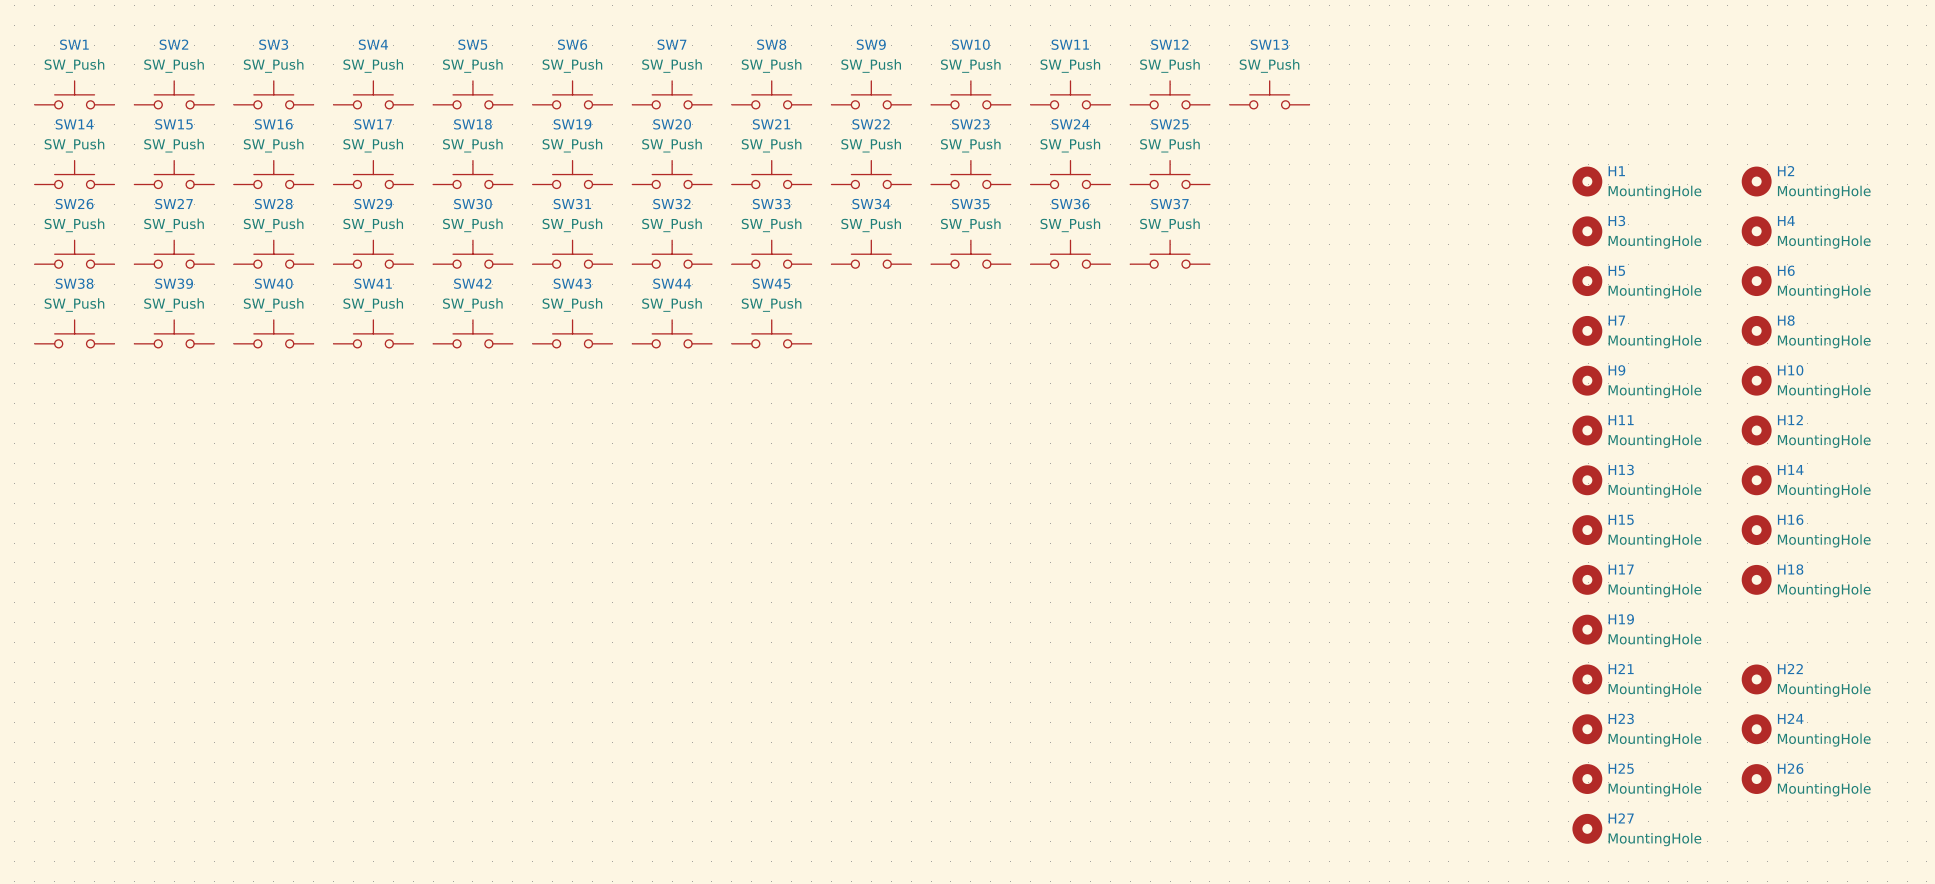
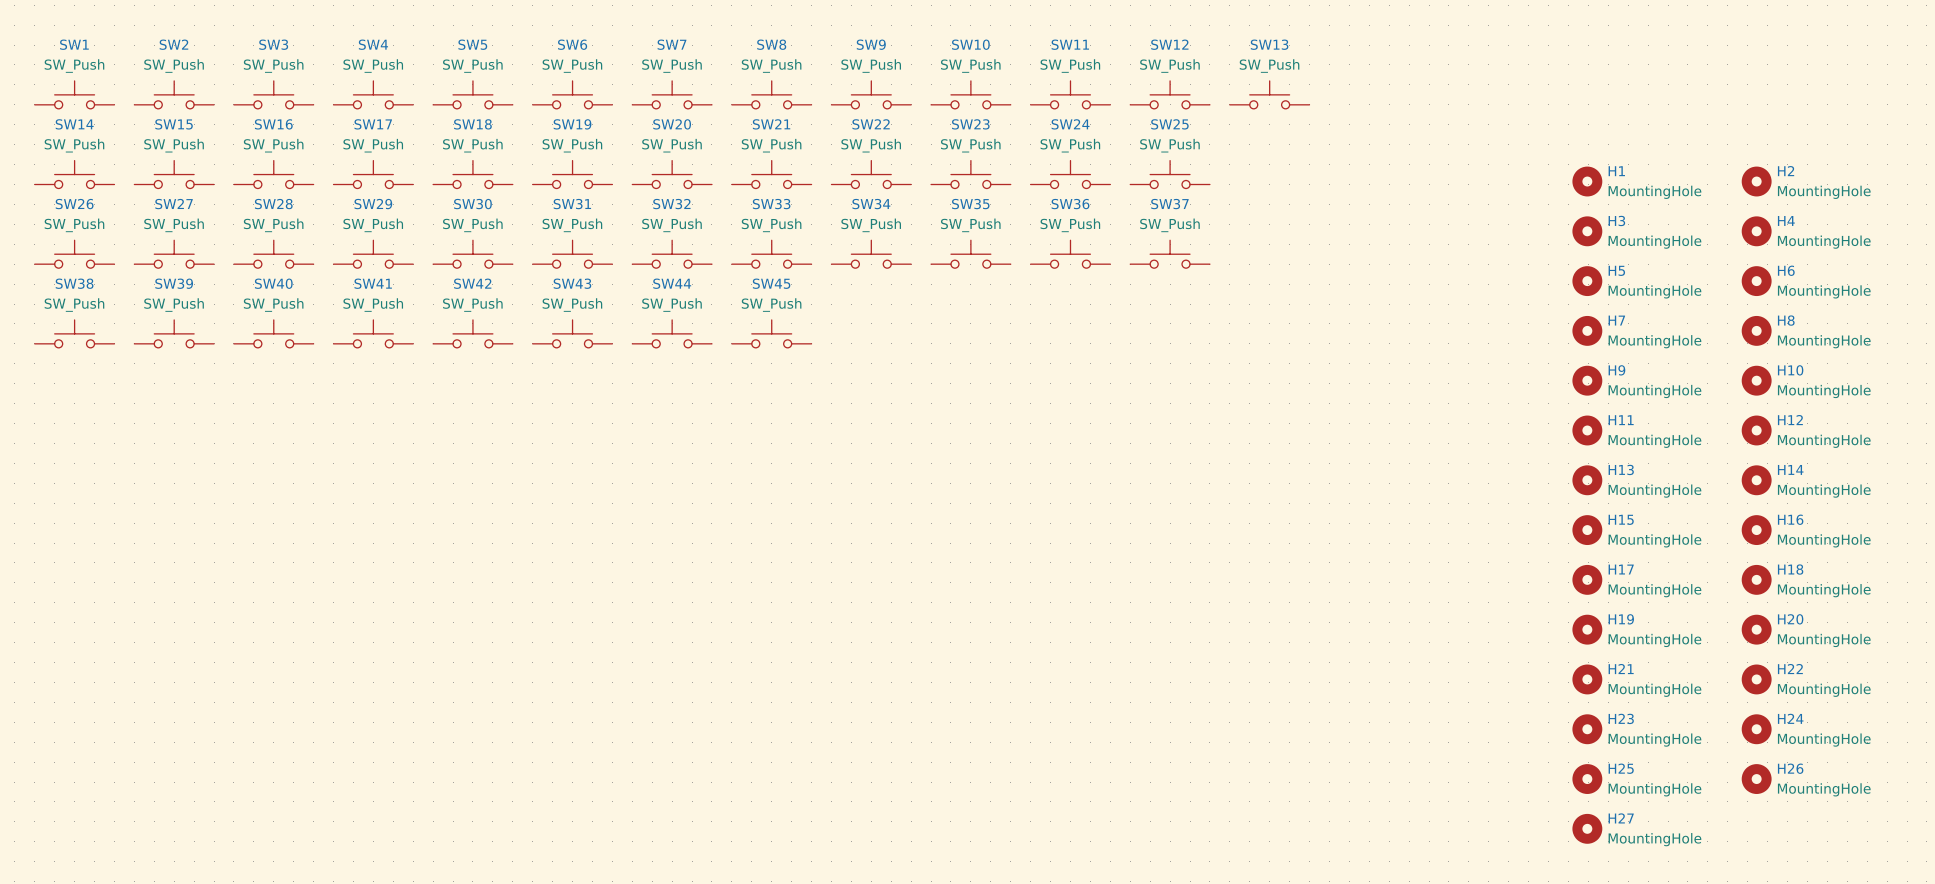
H20: none -> MountingHole (1756, 629)

